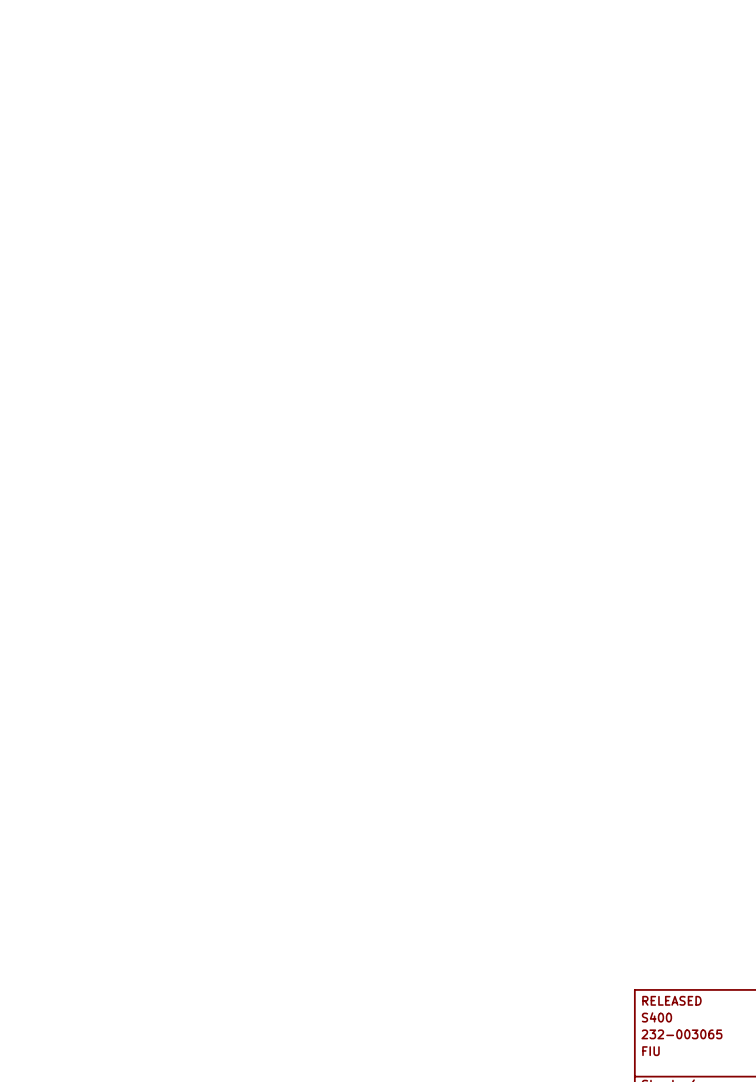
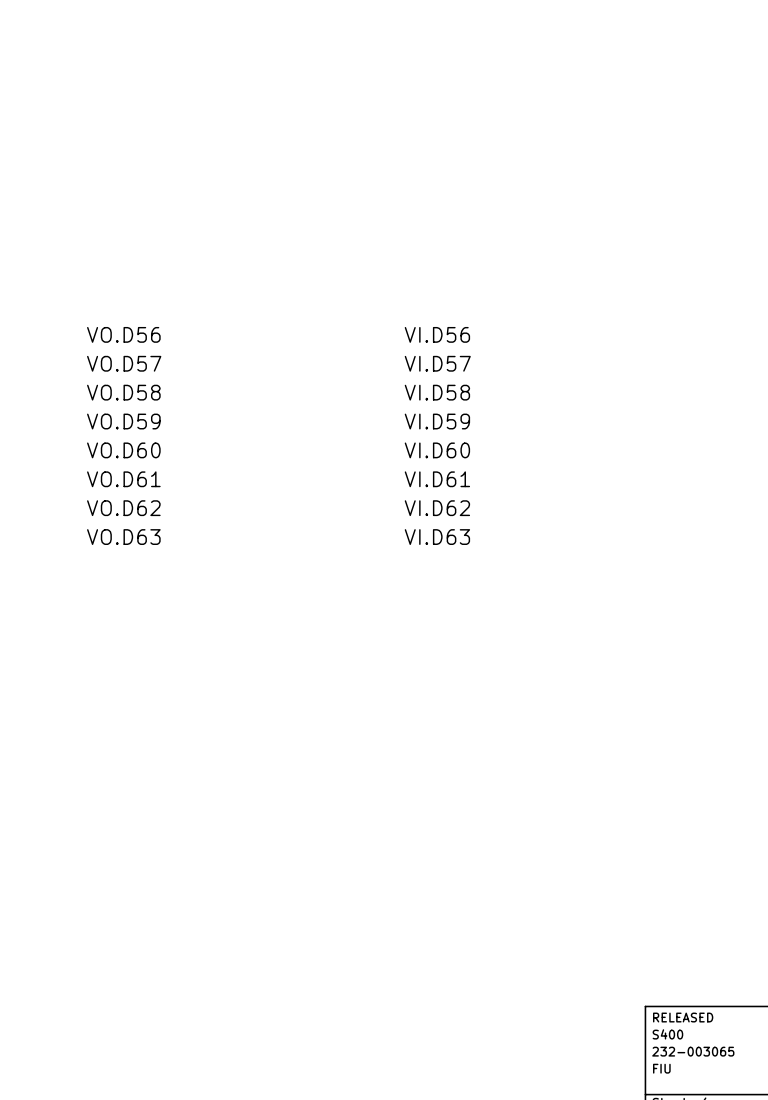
label: none -> VO.D56 (123, 334)
label: none -> VI.D56 (437, 334)
label: none -> VO.D57 (124, 363)
label: none -> VI.D57 (437, 363)
label: none -> VO.D58 (123, 392)
label: none -> VI.D58 (437, 392)
label: none -> VO.D59 (123, 421)
label: none -> VI.D59 (437, 421)
label: none -> VO.D60 (123, 450)
label: none -> VI.D60 (437, 450)
label: none -> VO.D61 (123, 479)
label: none -> VI.D61 (437, 479)
label: none -> VO.D62 (123, 508)
label: none -> VI.D62 (437, 508)
label: none -> VO.D63 (123, 537)
label: none -> VI.D63 (437, 537)

